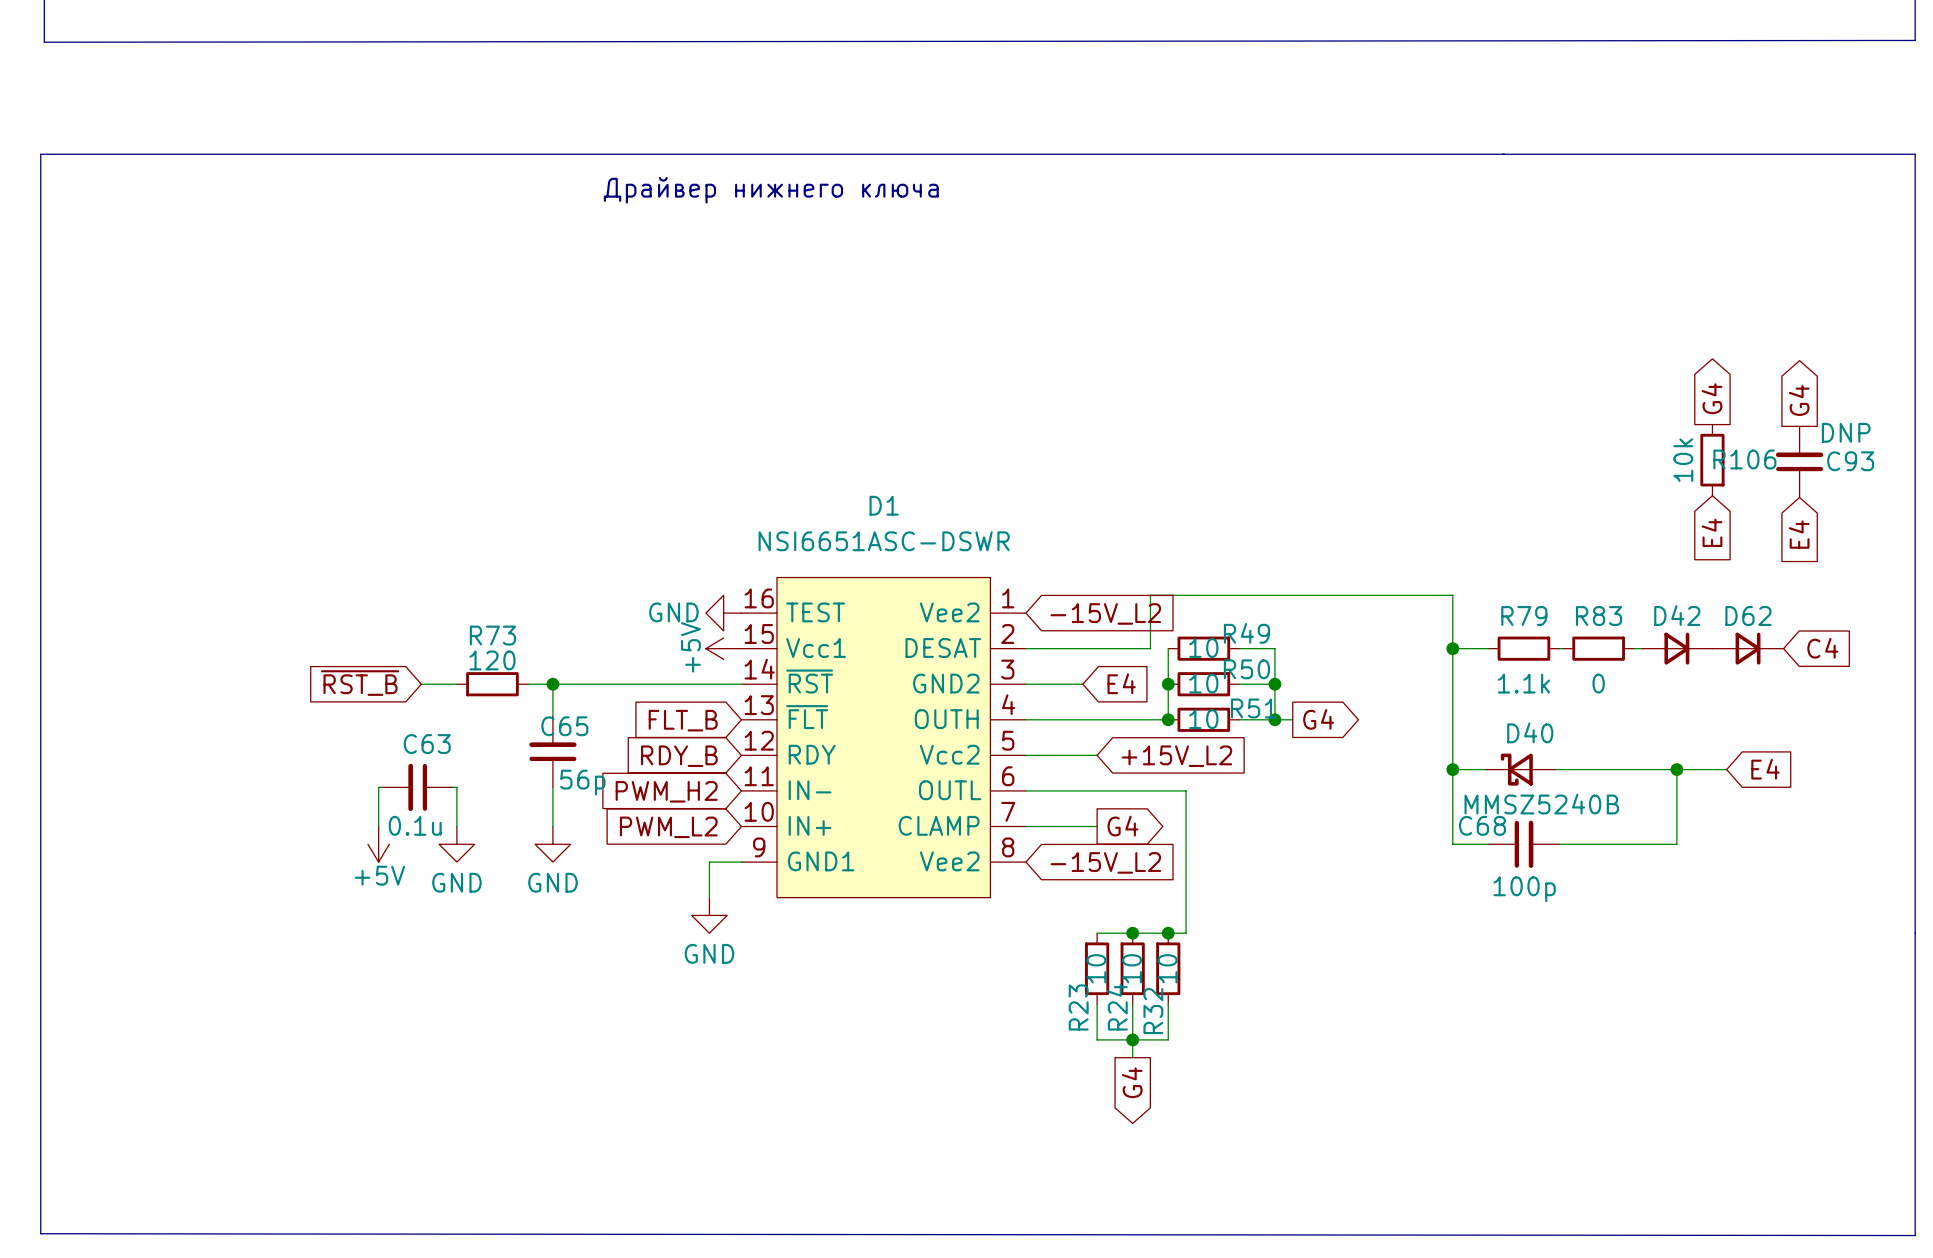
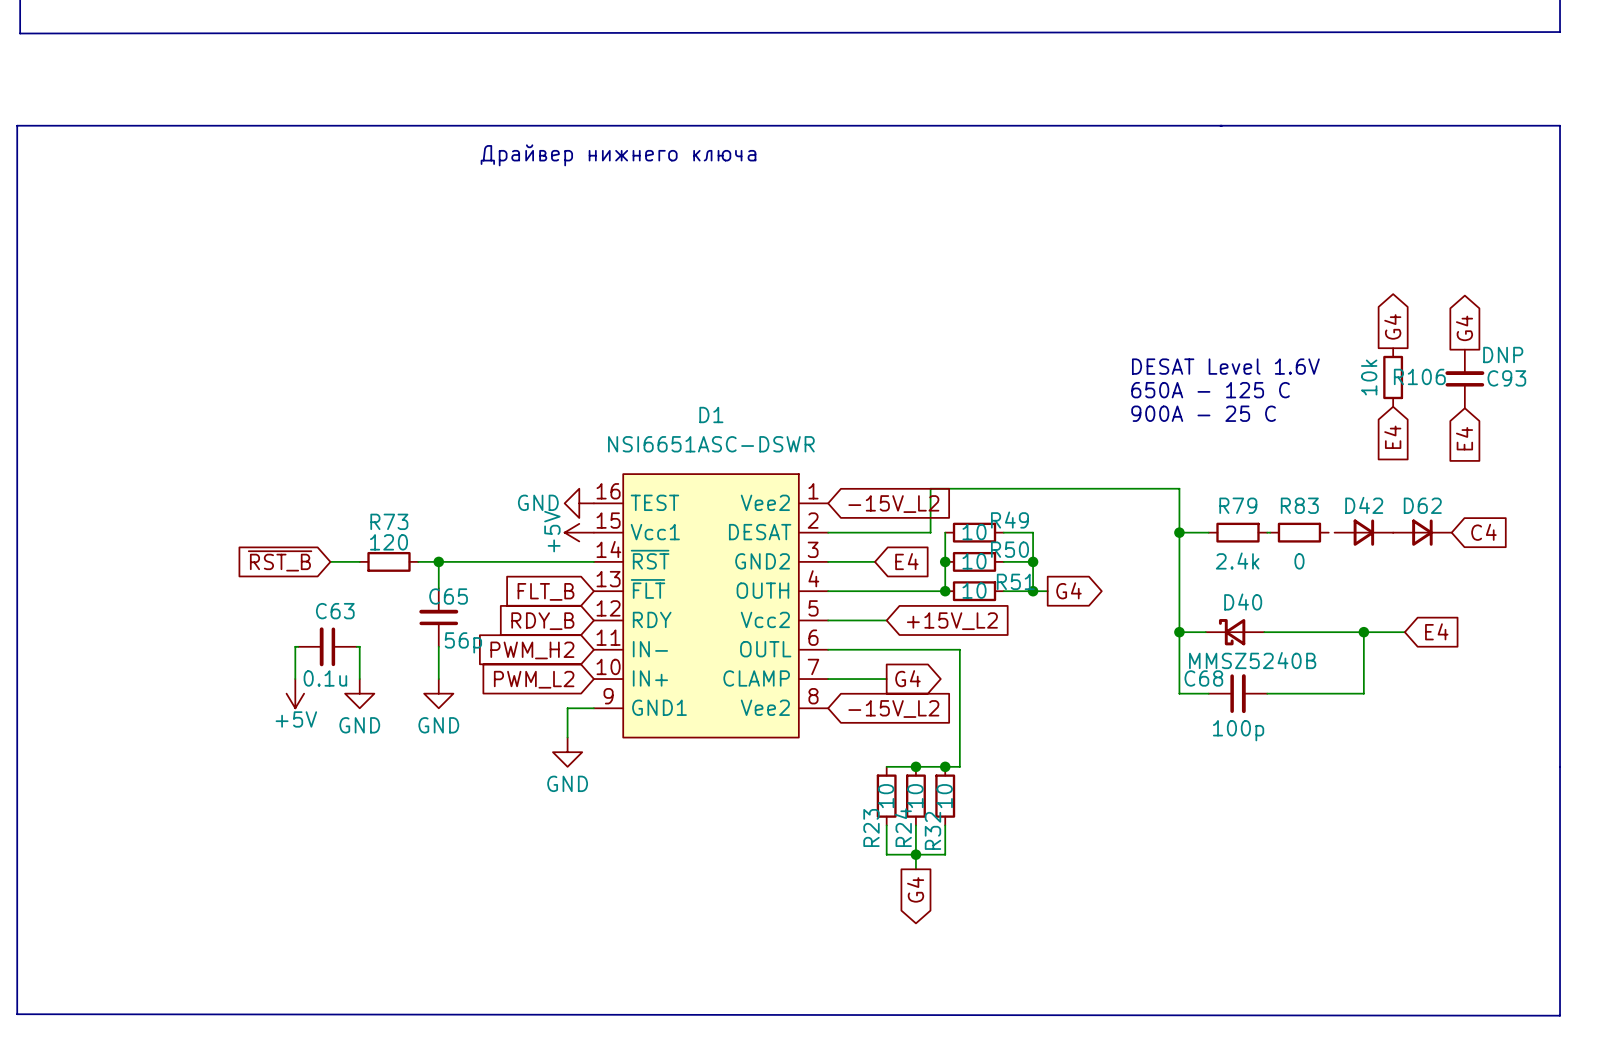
text: none -> DESAT Level 1.6V (1225, 366)
text: none -> 650A - 125 C (1210, 390)
text: none -> 900A - 25 C (1203, 413)
wire: (1634, 648) (1641, 648) -> none
R79 value: 1.1k (1523, 683) -> 2.4k (1237, 561)

